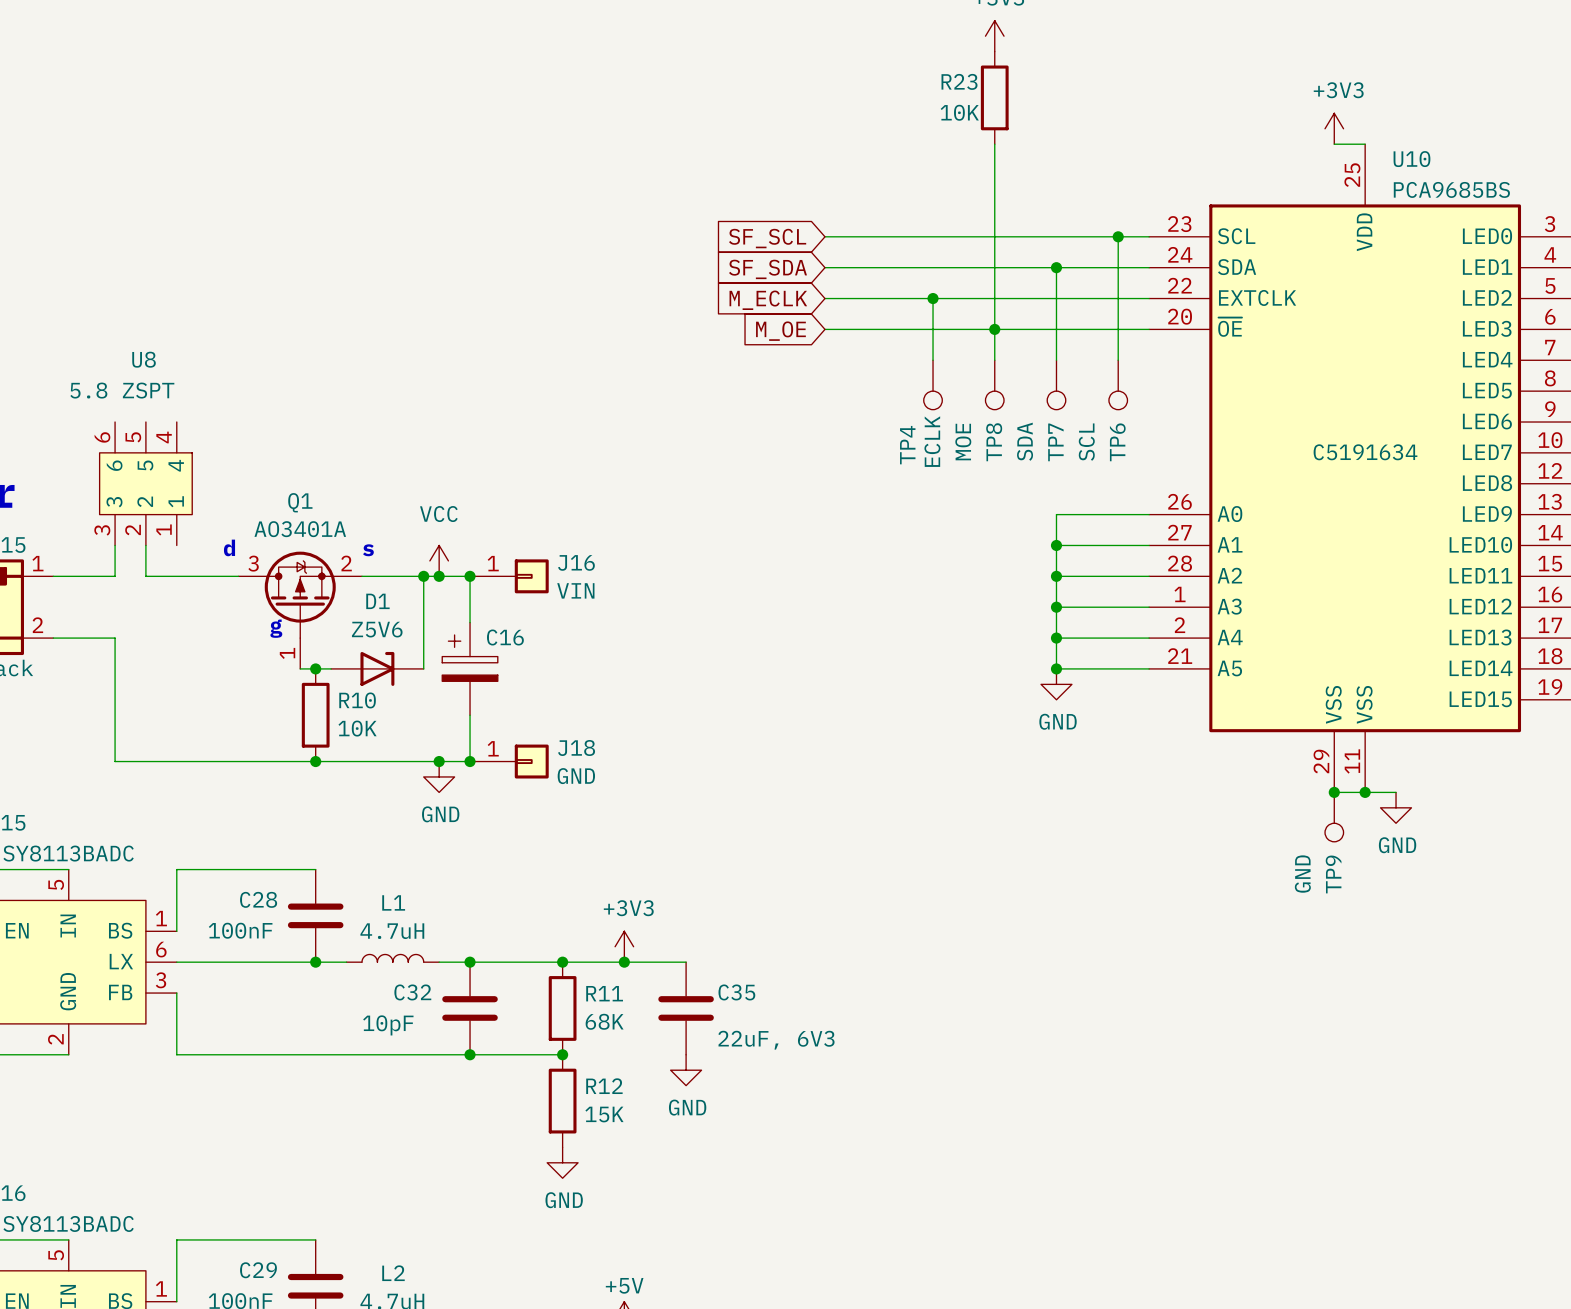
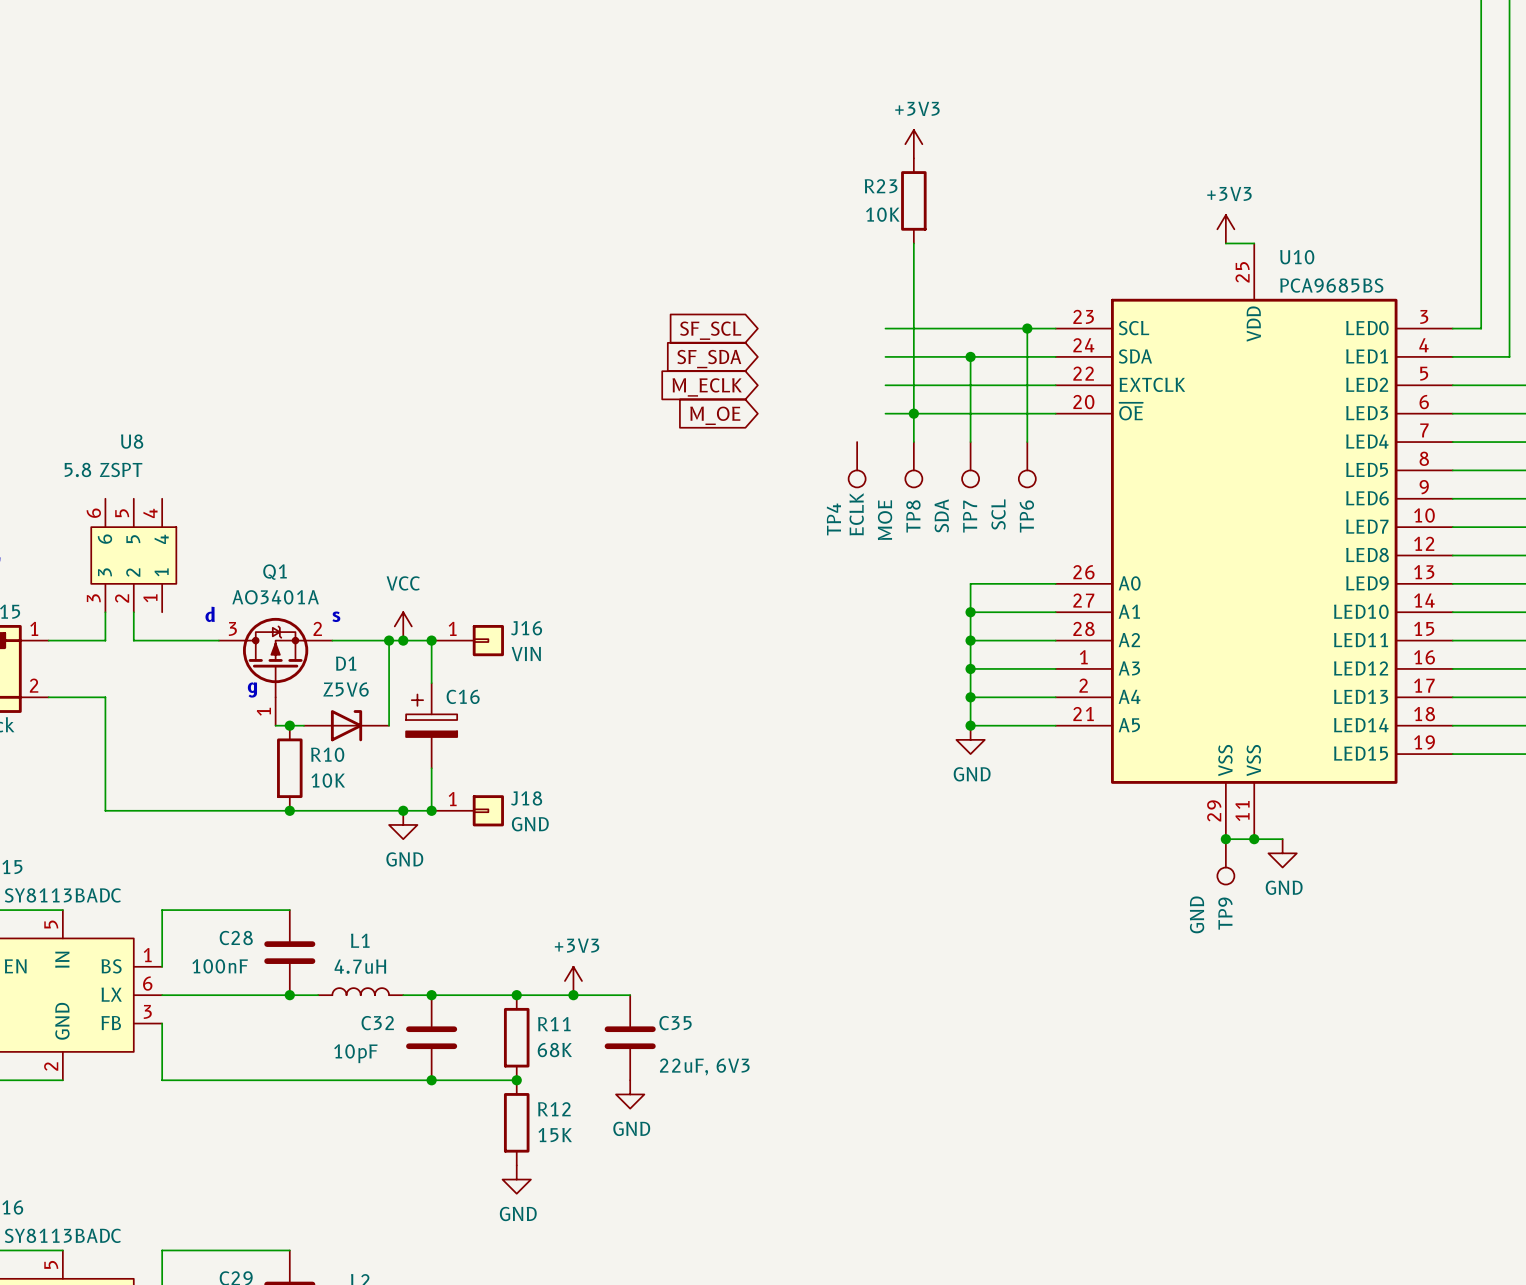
wire: (824, 236) (963, 236) -> none
wire: (824, 267) (963, 267) -> none
wire: (824, 298) (963, 298) -> none
wire: (933, 298) (933, 360) -> none
junction: (933, 298) -> none
wire: (824, 329) (963, 329) -> none
U10 text: C5191634 (1365, 452) -> none

